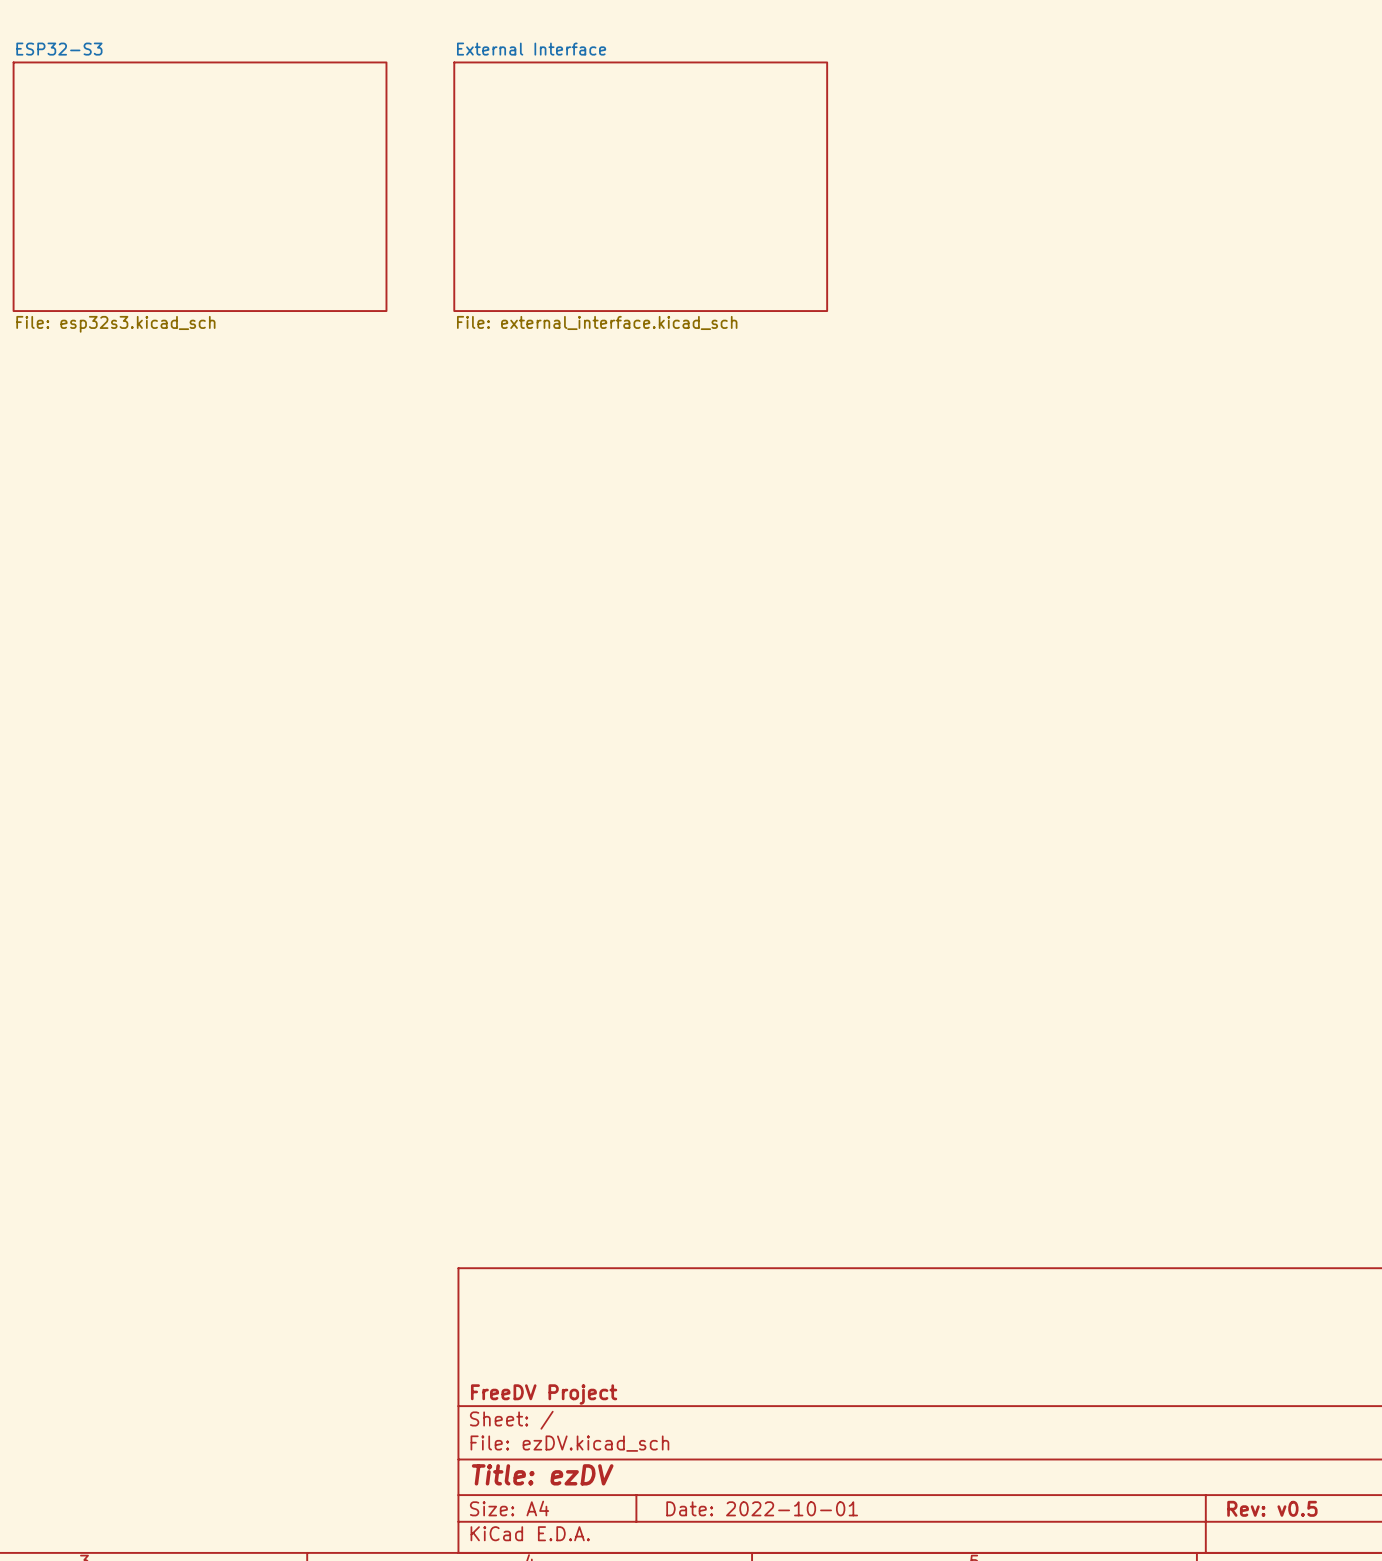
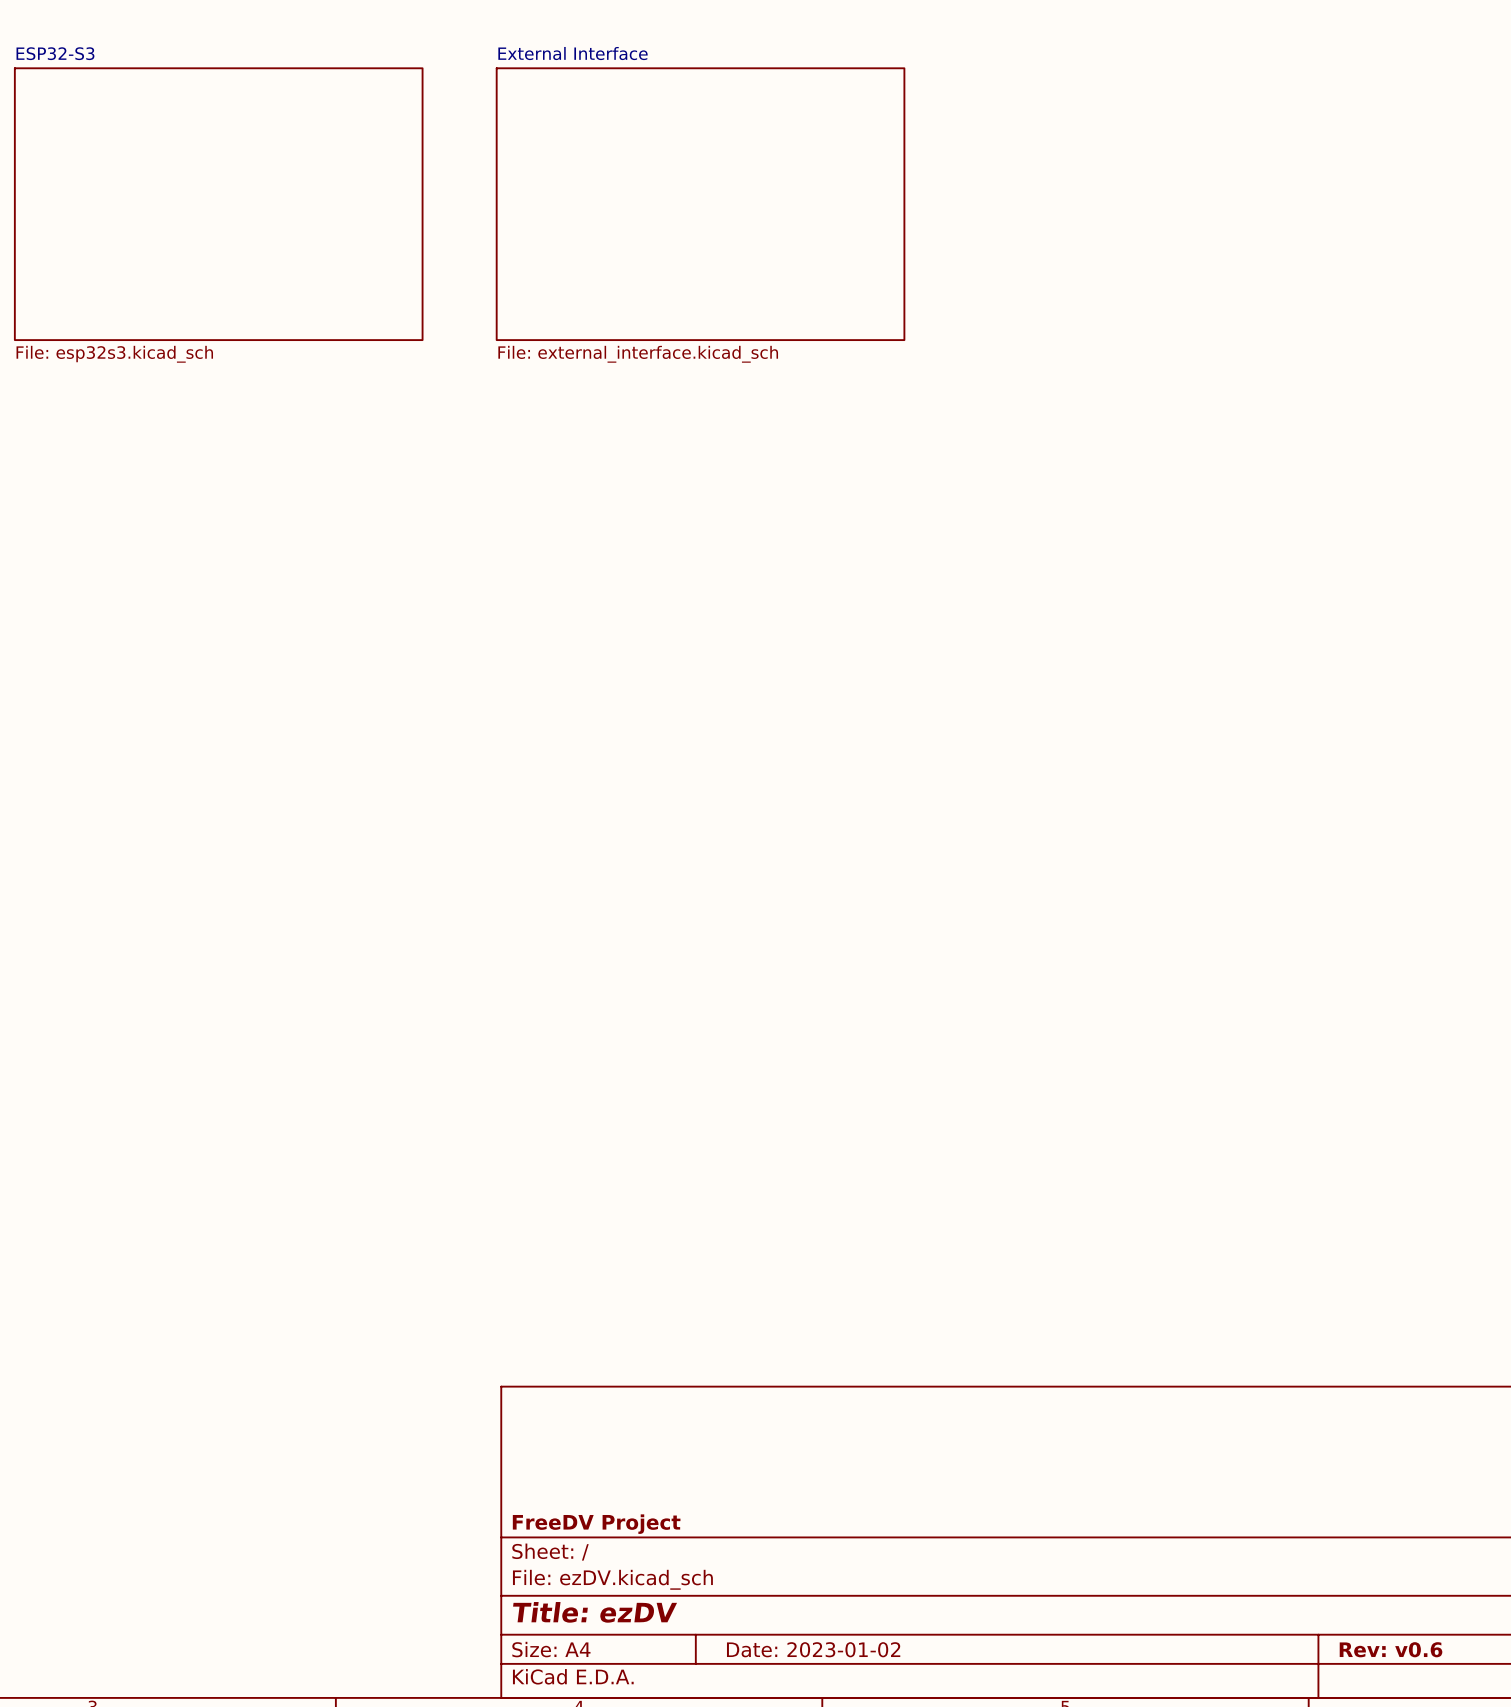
title block: Date: 2022-10-01 (762, 1508) -> Date: 2023-01-02 (813, 1649)
title block: Rev: v0.5 (1272, 1508) -> Rev: v0.6 (1391, 1649)

